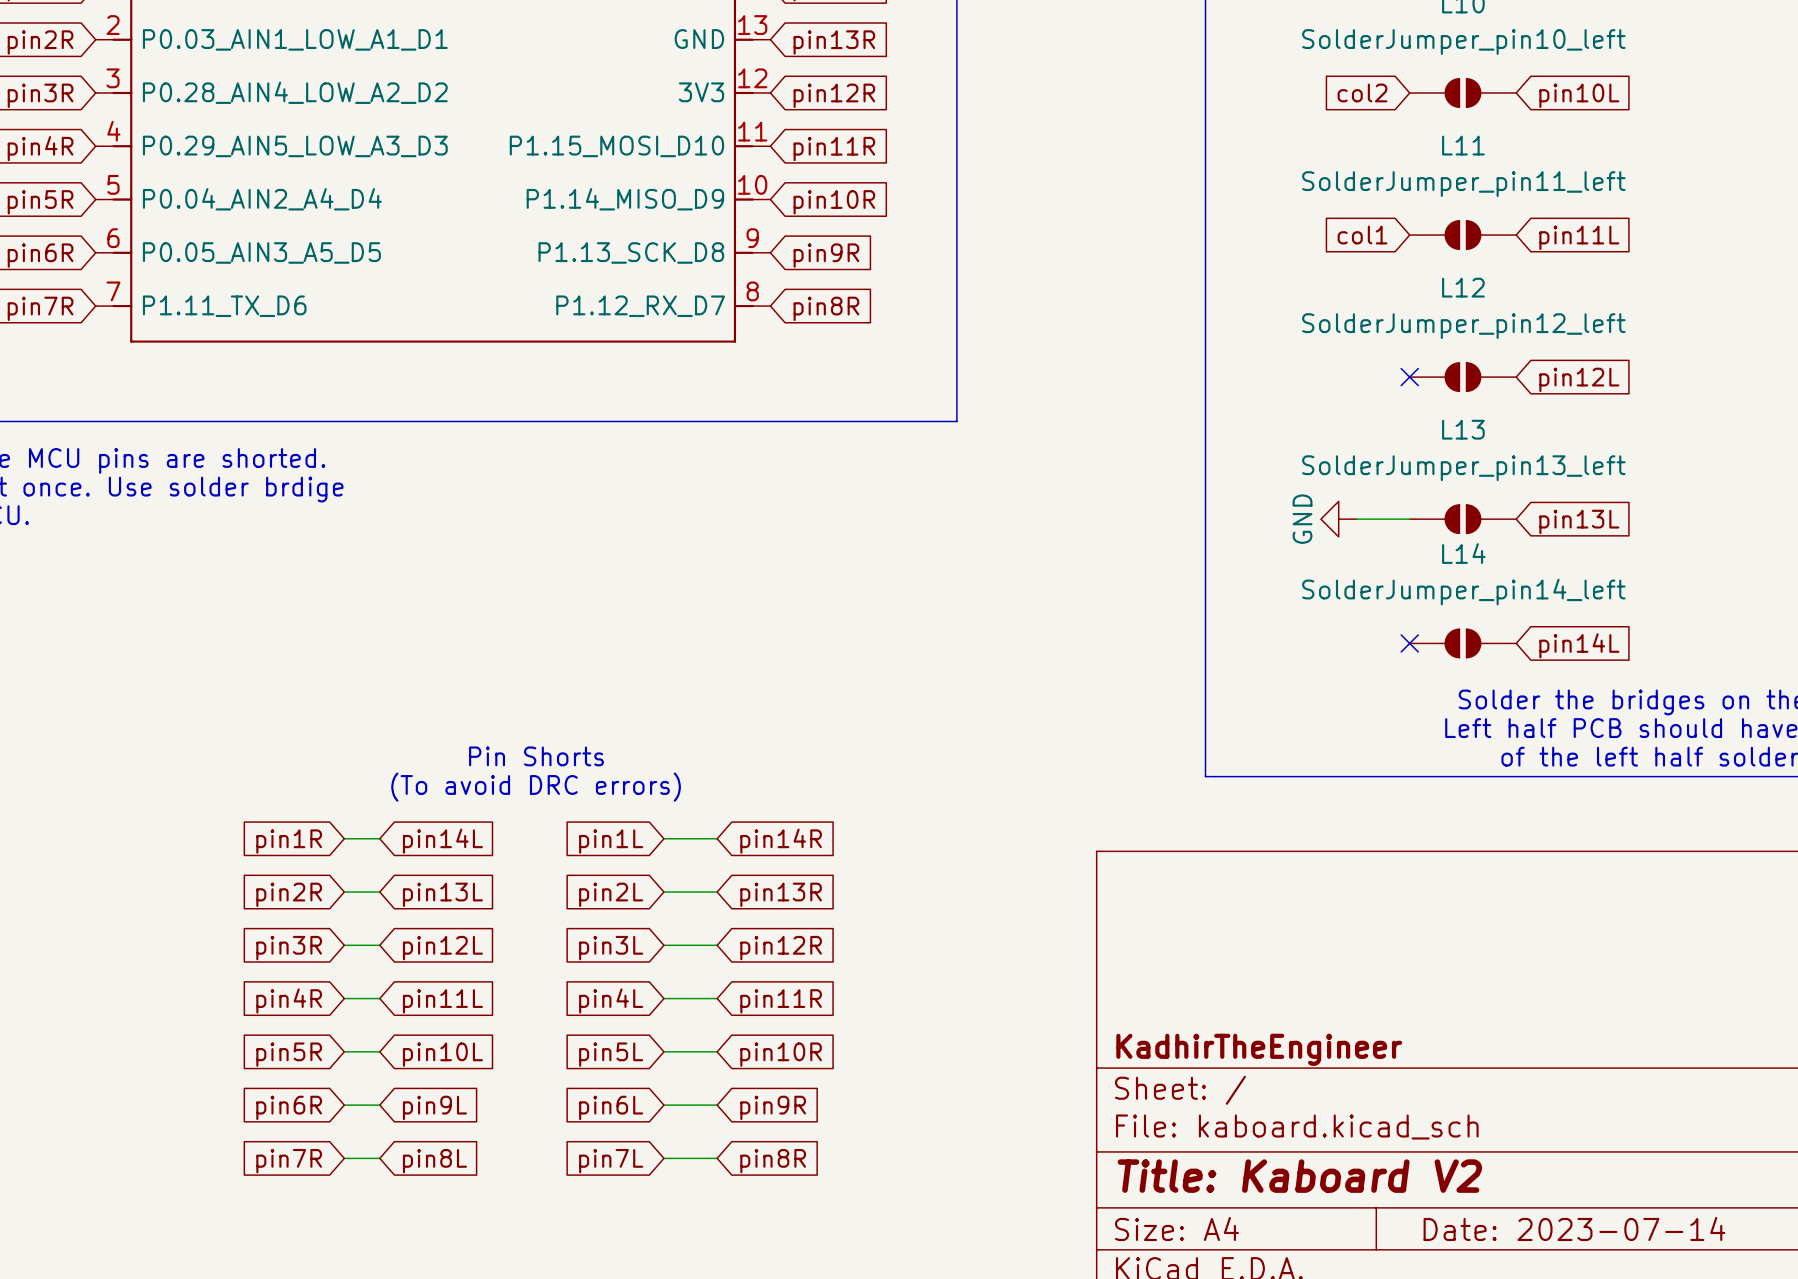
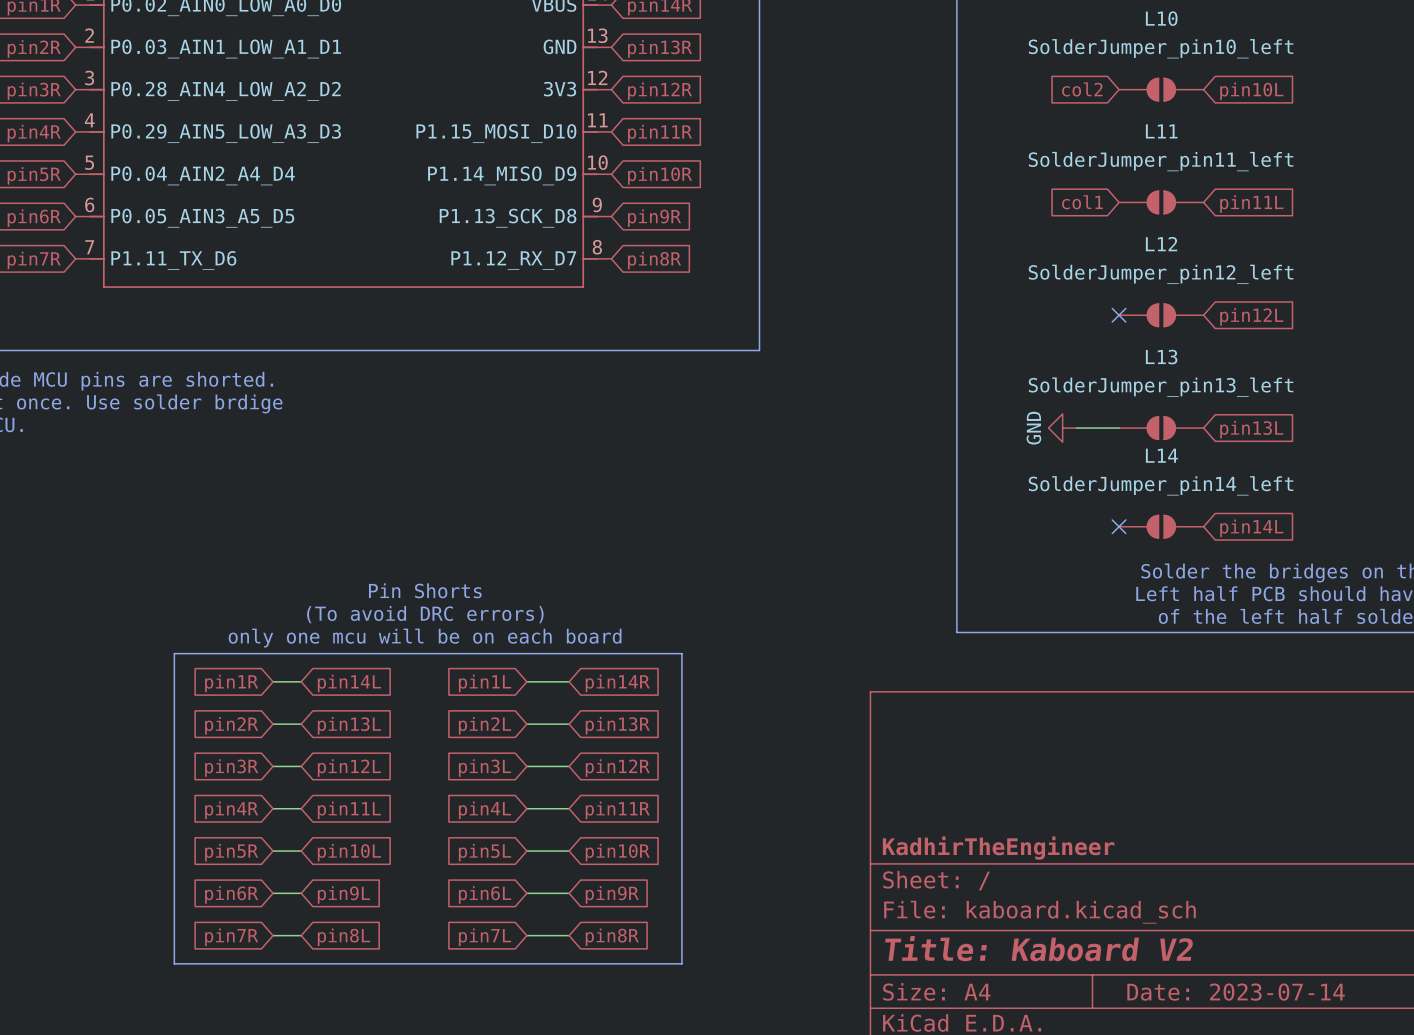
text: none -> Pin Shorts (425, 590)
text: Pin Shorts (536, 756) -> (To avoid DRC errors) (425, 614)
text: (To avoid DRC errors) (536, 787) -> only one mcu will be on each board (425, 638)
line: none -> (174, 653) (681, 653) (681, 963) (174, 963) (174, 653)

